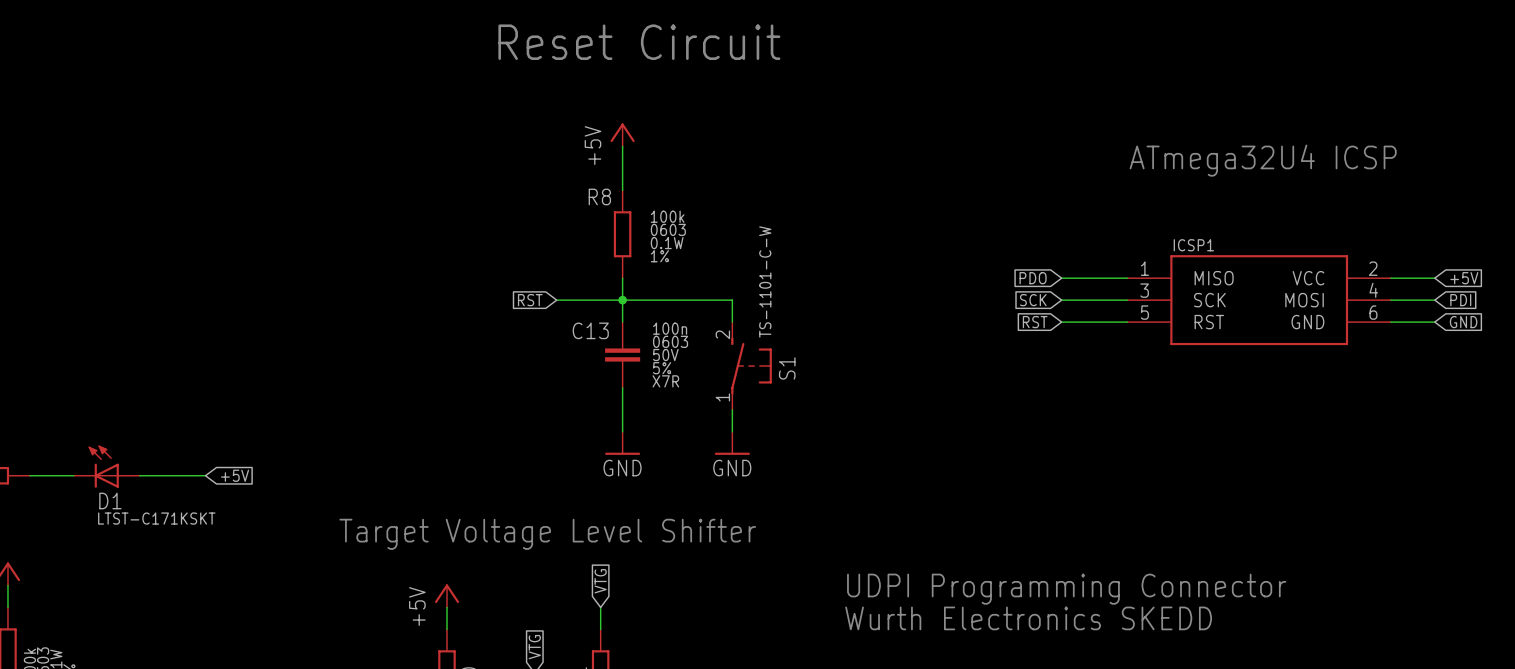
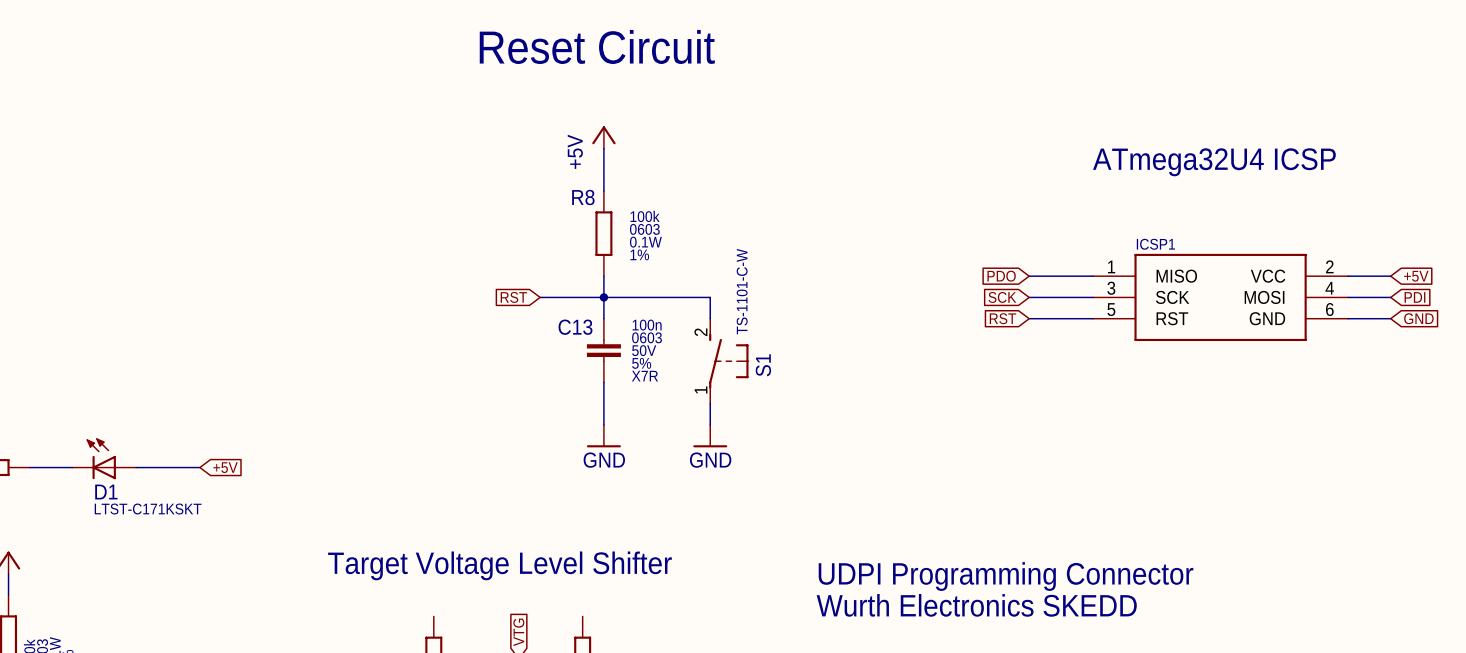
text position: Target Voltage Level Shifter (547, 534) -> Target Voltage Level Shifter (499, 565)
global label: VTG (600, 581) -> none
power symbol: +5V (447, 595) -> none
wire: (447, 607) (447, 629) -> none
wire: (600, 607) (600, 629) -> none

